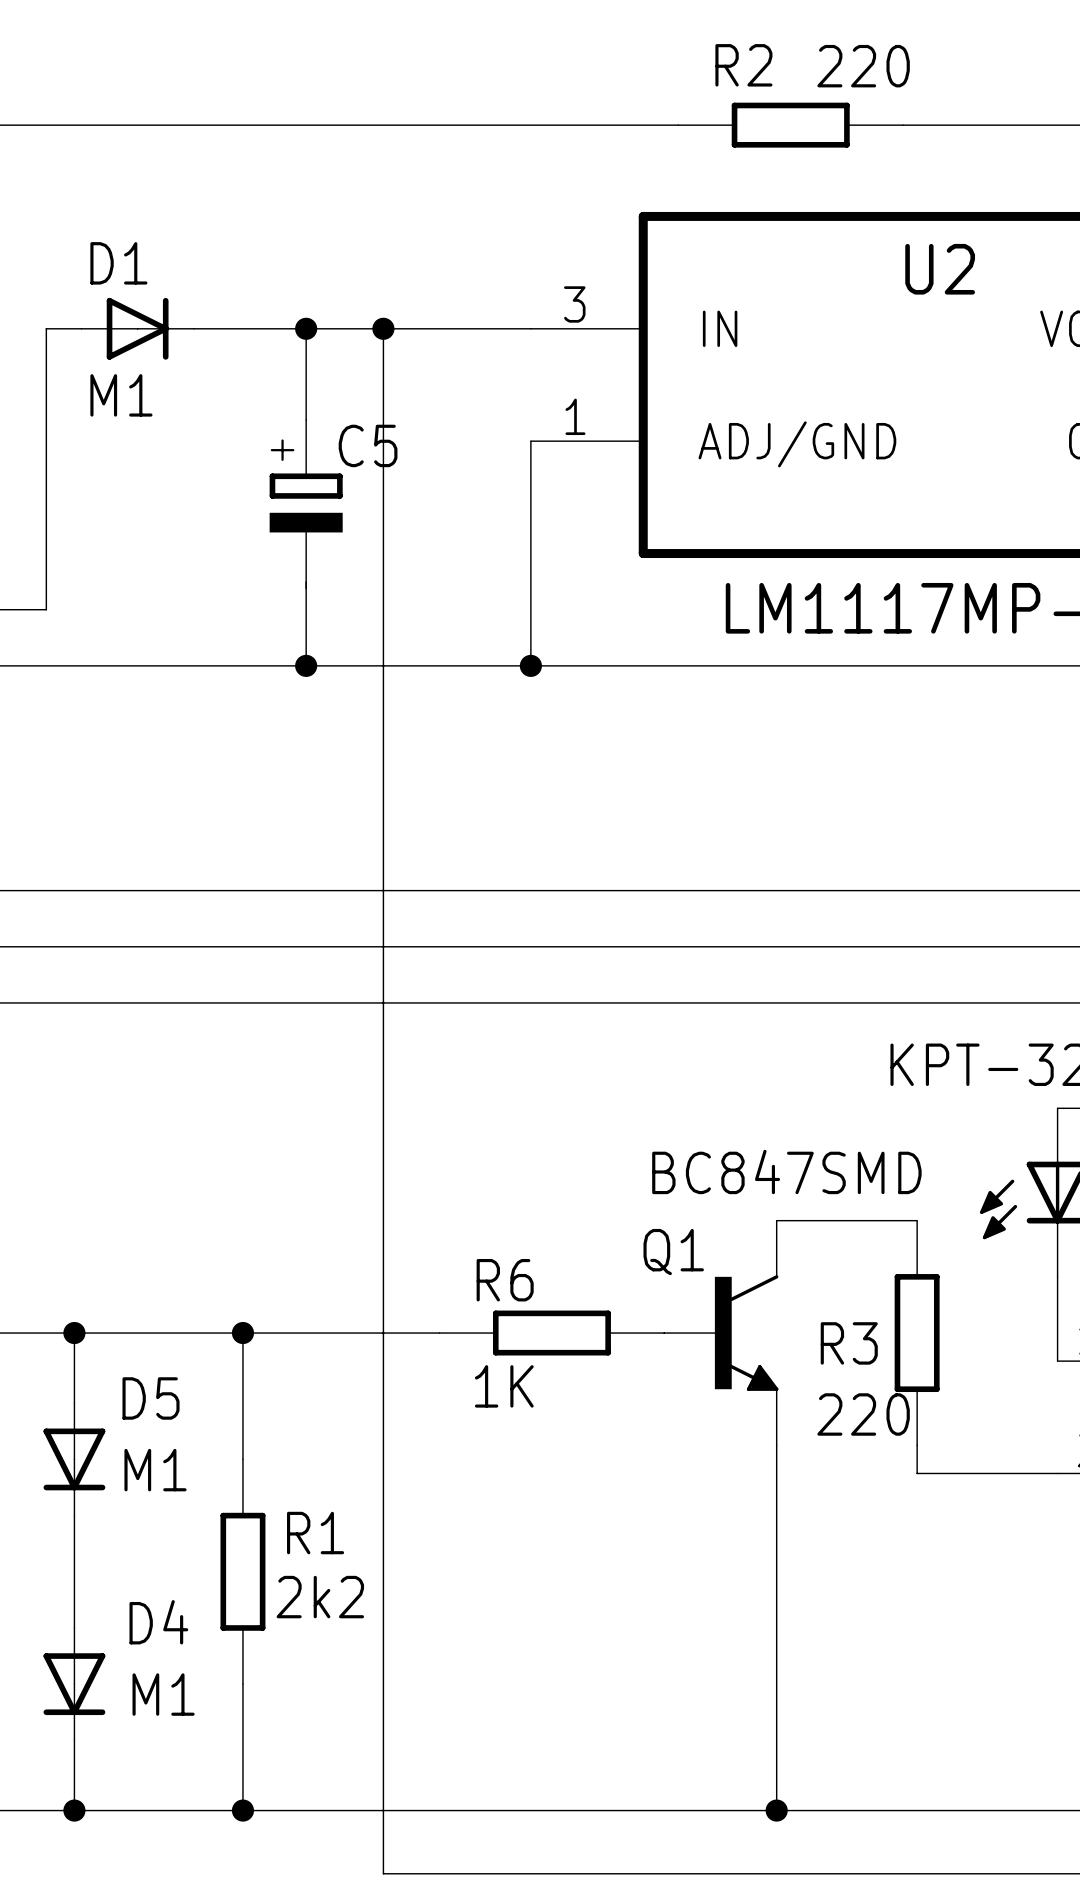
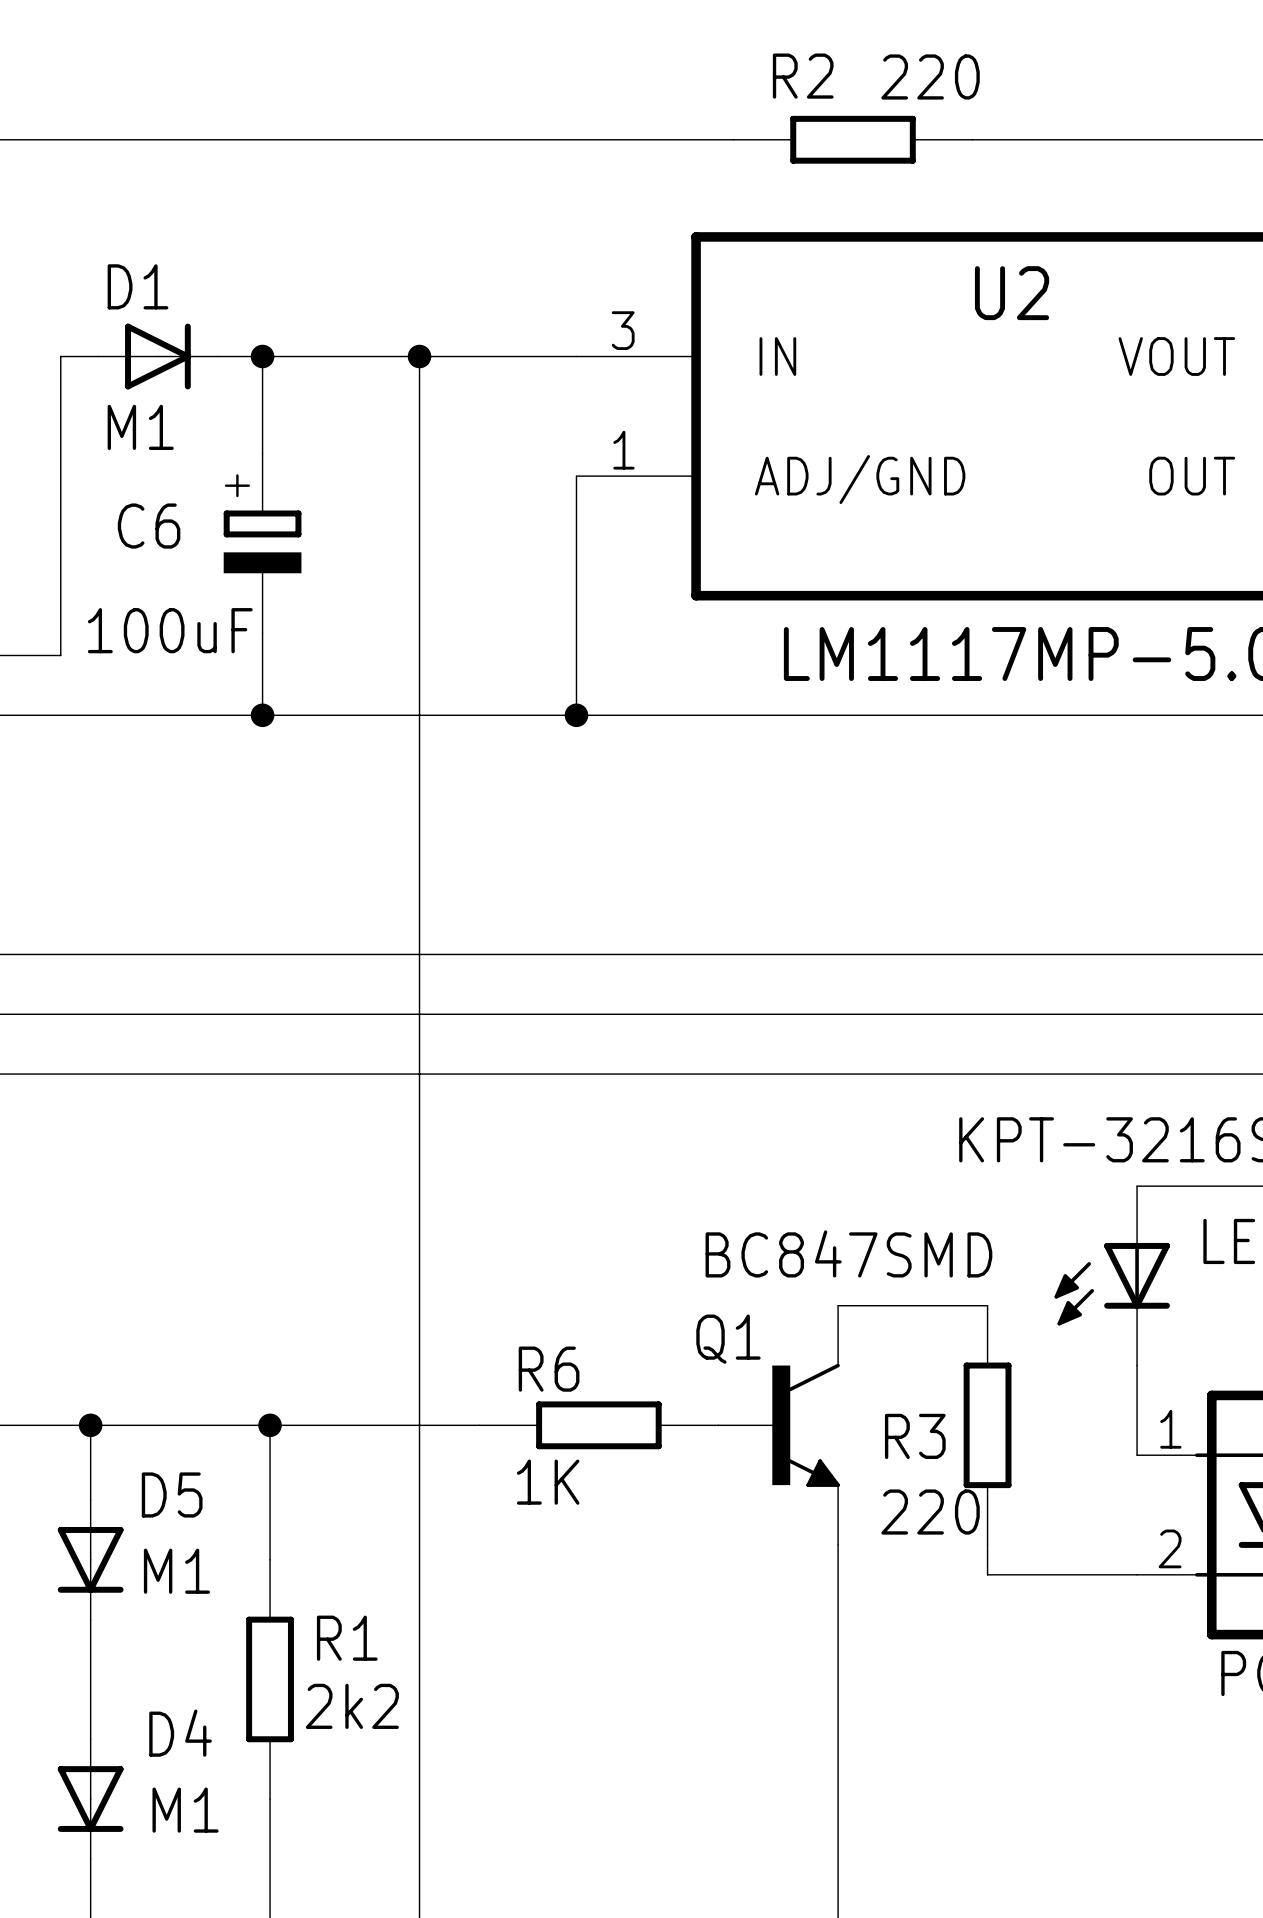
wire: (306, 328) (306, 420) -> (262, 356) (262, 453)
junction position: (306, 328) -> (262, 356)
C6: none -> 100uF (262, 543)
C5: (306, 504) -> none
wire: (306, 581) (306, 665) -> none
wire: none -> (262, 633) (262, 715)
junction position: (306, 665) -> (262, 715)

